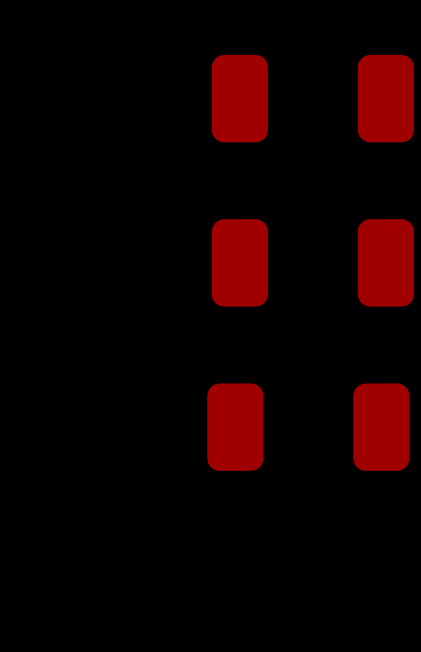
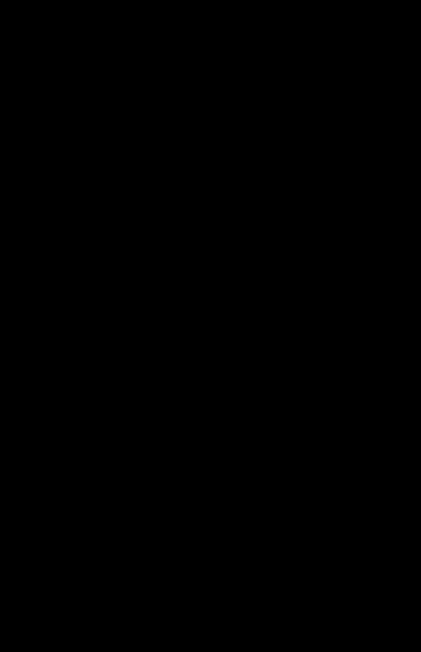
part: (312, 98) -> none
part: (312, 262) -> none
part: (308, 427) -> none

